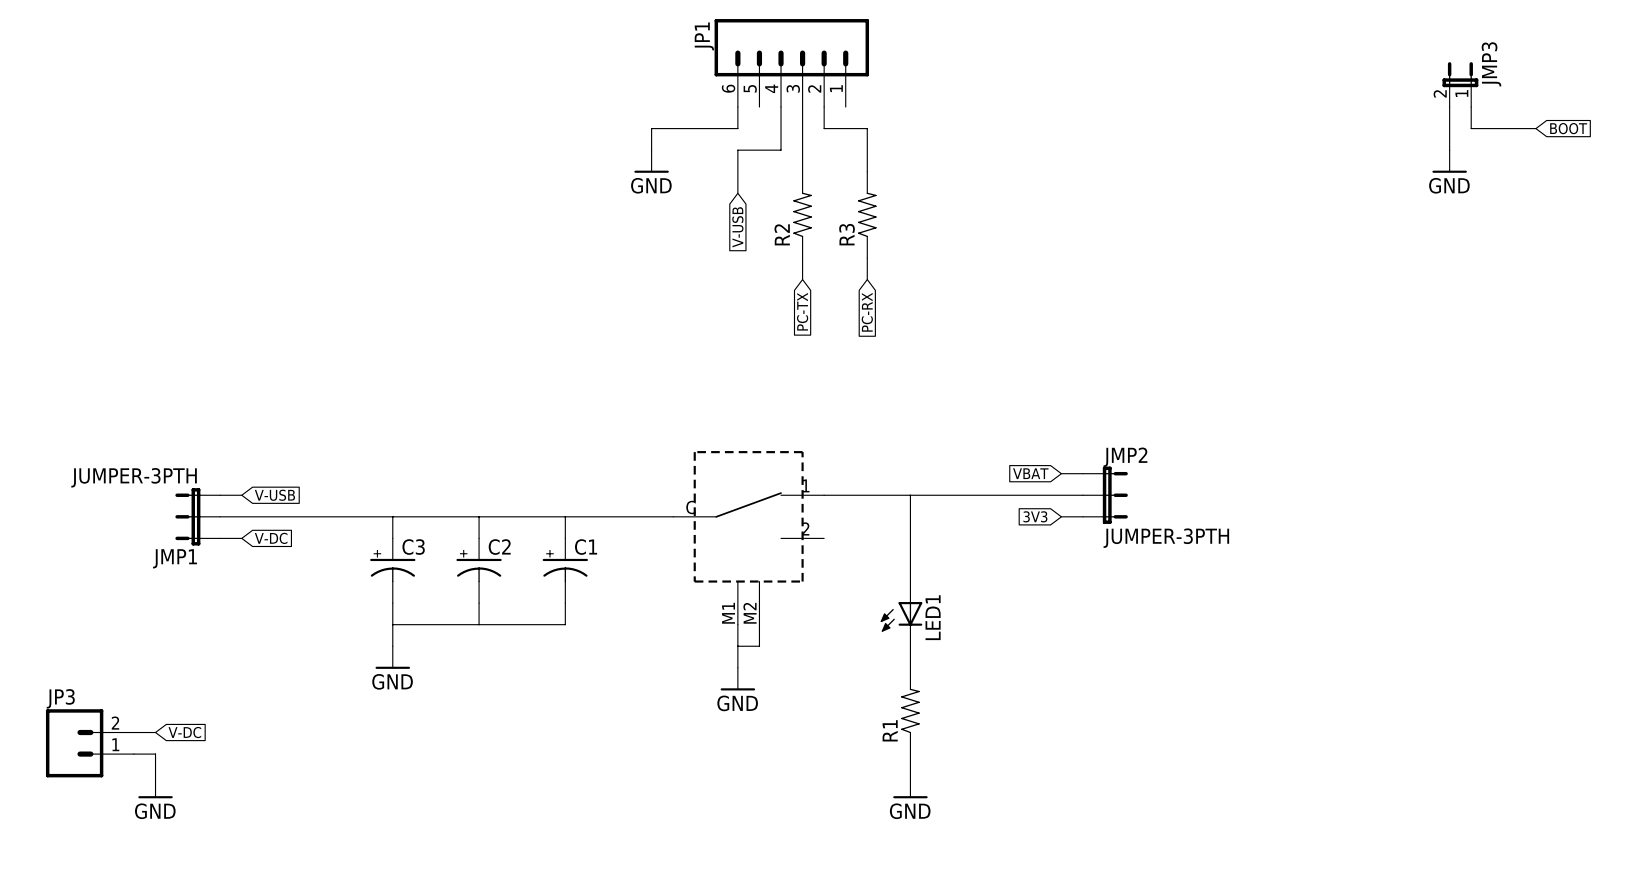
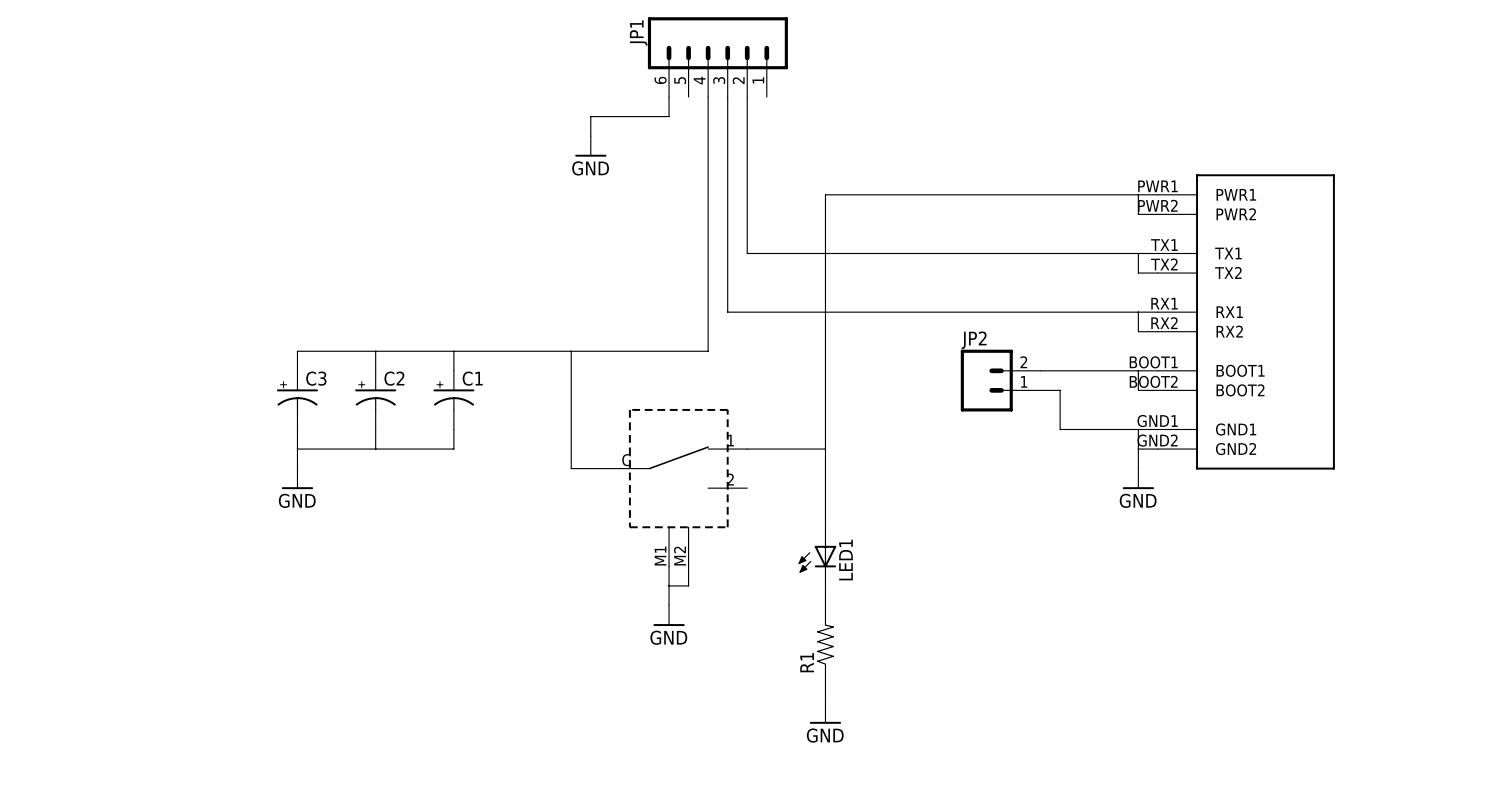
JMP3: (1460, 84) -> none
wire: (1449, 107) (1449, 150) -> none
wire: (1471, 107) (1471, 128) (1535, 128) -> none
wire: (824, 128) (867, 128) (867, 171) -> (747, 116) (747, 253) (1157, 253)
global label: BOOT (1568, 128) -> none
wire: (781, 150) (737, 150) (737, 193) -> (708, 136) (708, 351) (297, 351) (297, 370)
power symbol: GND (1449, 161) -> none
R2: (802, 214) -> none
R3: (867, 214) -> none
wire: none -> (1138, 194) (1138, 214) (1157, 214)
global label: V-USB (737, 227) -> none
wire: (867, 258) (867, 279) -> none
wire: none -> (727, 253) (727, 312) (1157, 312)
wire: none -> (1138, 253) (1138, 273) (1157, 273)
global label: PC-TX (802, 311) -> none
global label: PC-RX (867, 312) -> none
wire: none -> (1138, 312) (1138, 331) (1157, 331)
part: none -> (1246, 321)
wire: none -> (1040, 370) (1157, 370)
wire: none -> (1138, 370) (1138, 390) (1157, 390)
JP2: none -> (1000, 380)
wire: none -> (1040, 390) (1060, 390) (1060, 429) (1157, 429)
global label: VBAT (1030, 473) -> none
wire: (1061, 473) (1082, 473) -> (1138, 449) (1157, 449)
wire: none -> (1138, 429) (1138, 468)
wire: (220, 495) (241, 495) -> none
global label: V-USB (274, 495) -> none
wire: (910, 495) (1082, 495) -> (825, 449) (825, 194) (1157, 194)
JMP2: JUMPER-3PTH (1105, 495) -> none
JMP1: JUMPER-3PTH (197, 516) -> none
wire: (220, 516) (630, 516) -> (571, 351) (571, 468)
wire: (392, 516) (392, 538) -> none
wire: (479, 516) (479, 538) -> (375, 351) (375, 370)
wire: (565, 516) (565, 538) -> (453, 351) (453, 370)
global label: 3V3 (1035, 516) -> none
wire: (1061, 516) (1082, 516) -> none
power symbol: none -> GND (1138, 478)
wire: (220, 538) (241, 538) -> none
global label: V-DC (271, 538) -> none
C3 position: (392, 570) -> (297, 400)
C2 position: (479, 570) -> (375, 400)
C1 position: (565, 570) -> (453, 400)
wire: (392, 603) (392, 646) -> (297, 429) (297, 468)
wire: (479, 603) (479, 624) -> (375, 429) (375, 449)
wire: (565, 603) (565, 624) (392, 624) -> (453, 429) (453, 449) (297, 449)
power symbol position: GND (392, 657) -> GND (297, 478)
wire: (133, 732) (155, 732) -> none
global label: V-DC (184, 732) -> none
JP3: (89, 743) -> none
wire: (133, 754) (155, 754) (155, 775) -> none
power symbol: GND (155, 786) -> none

